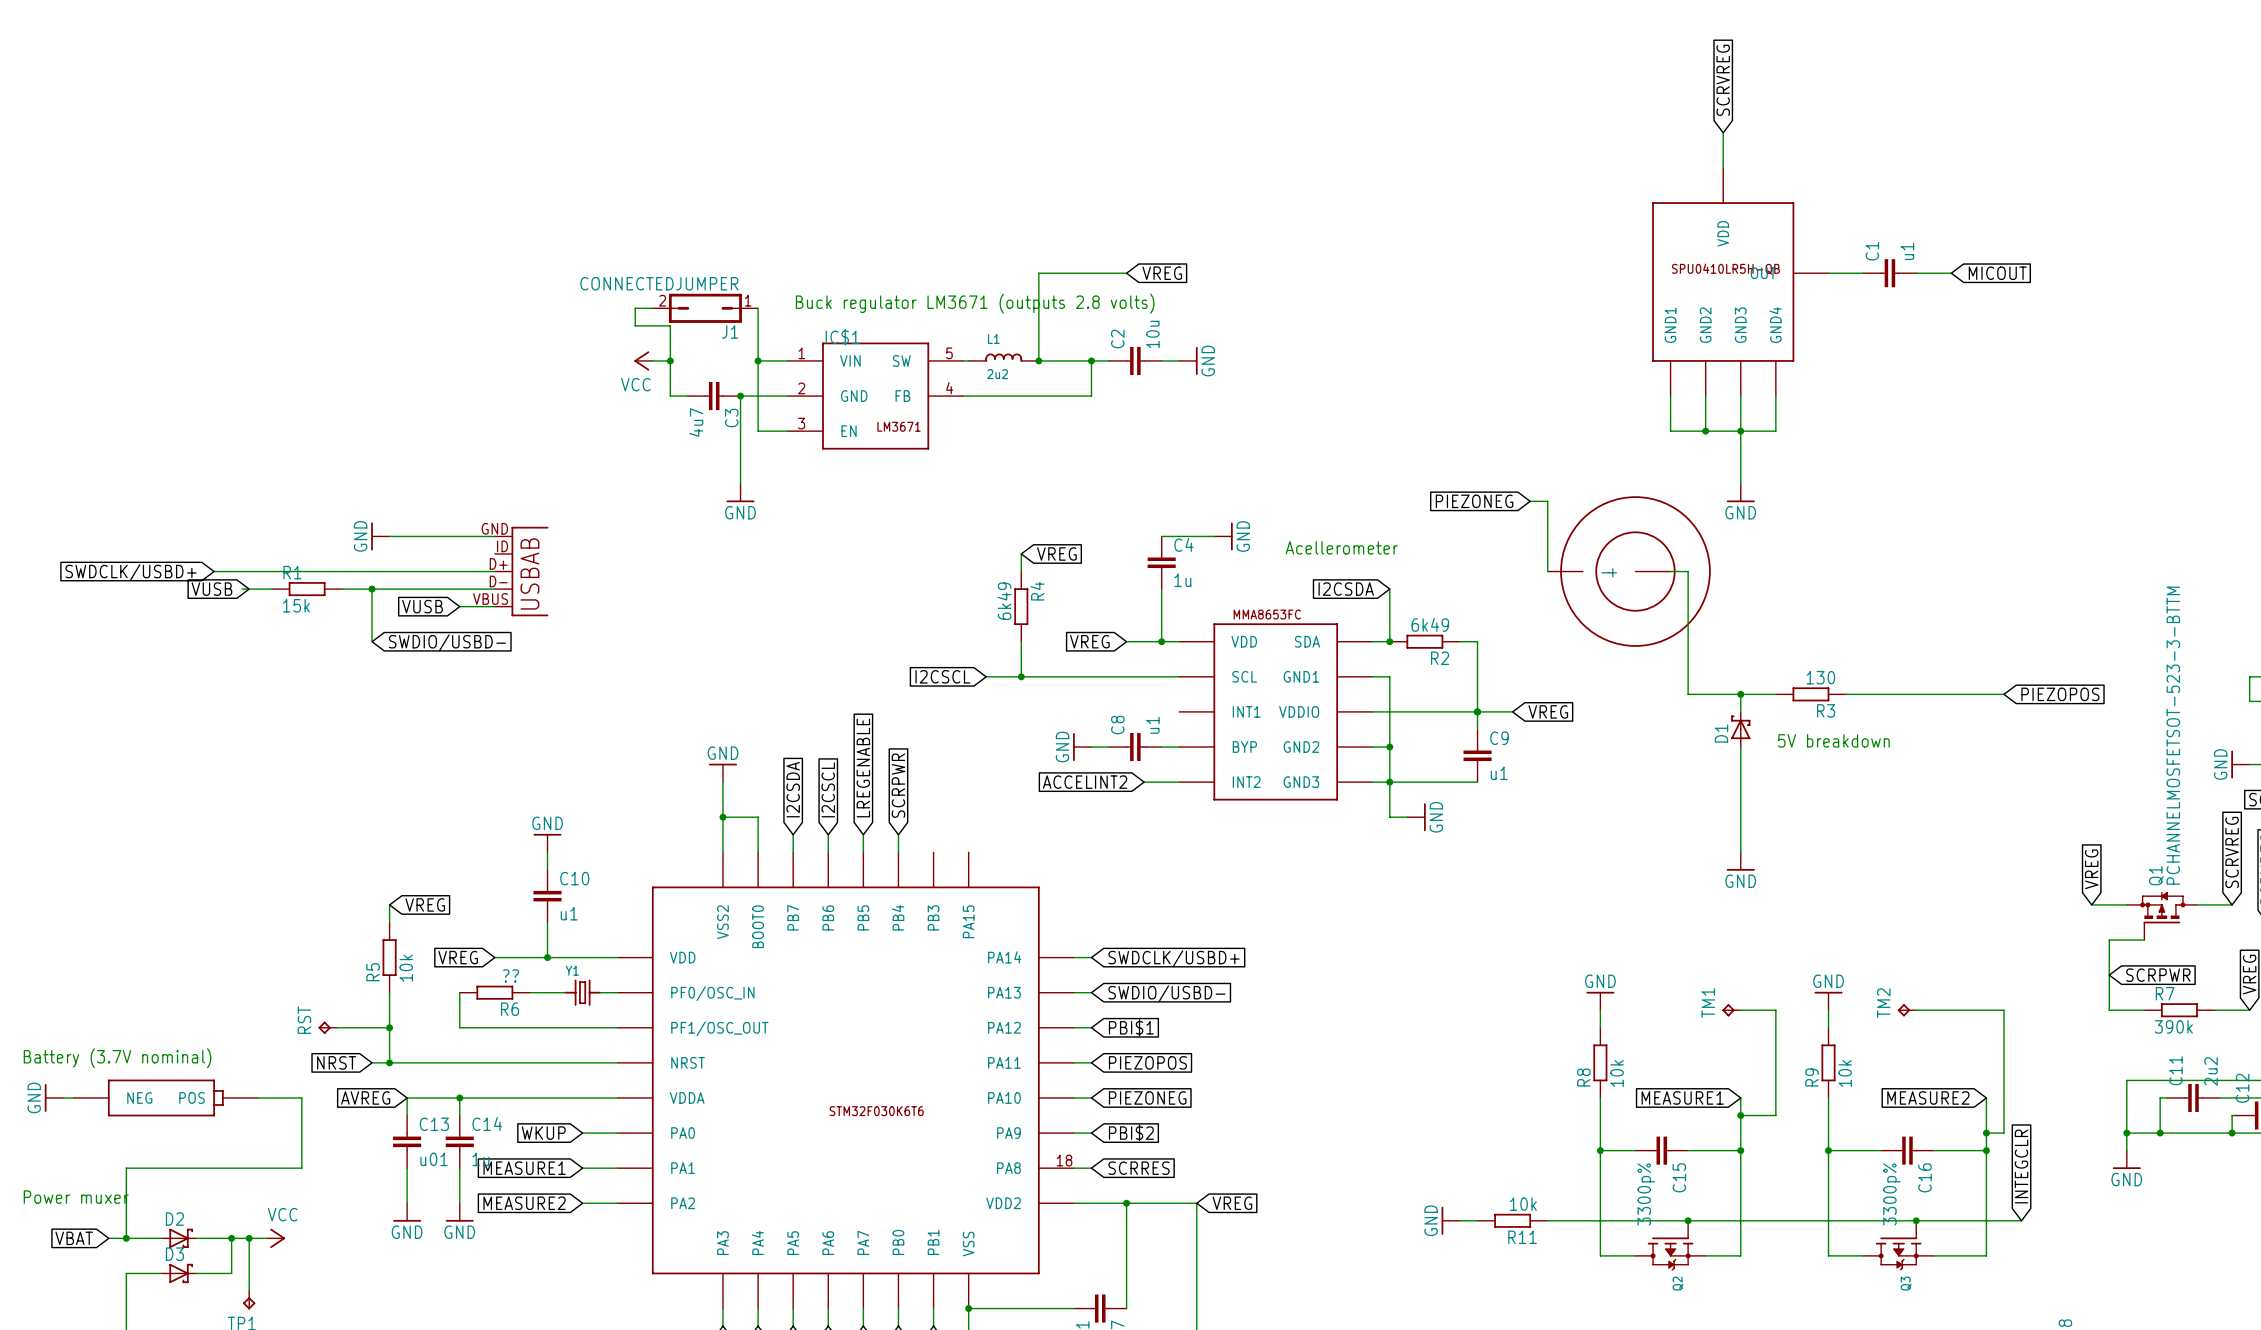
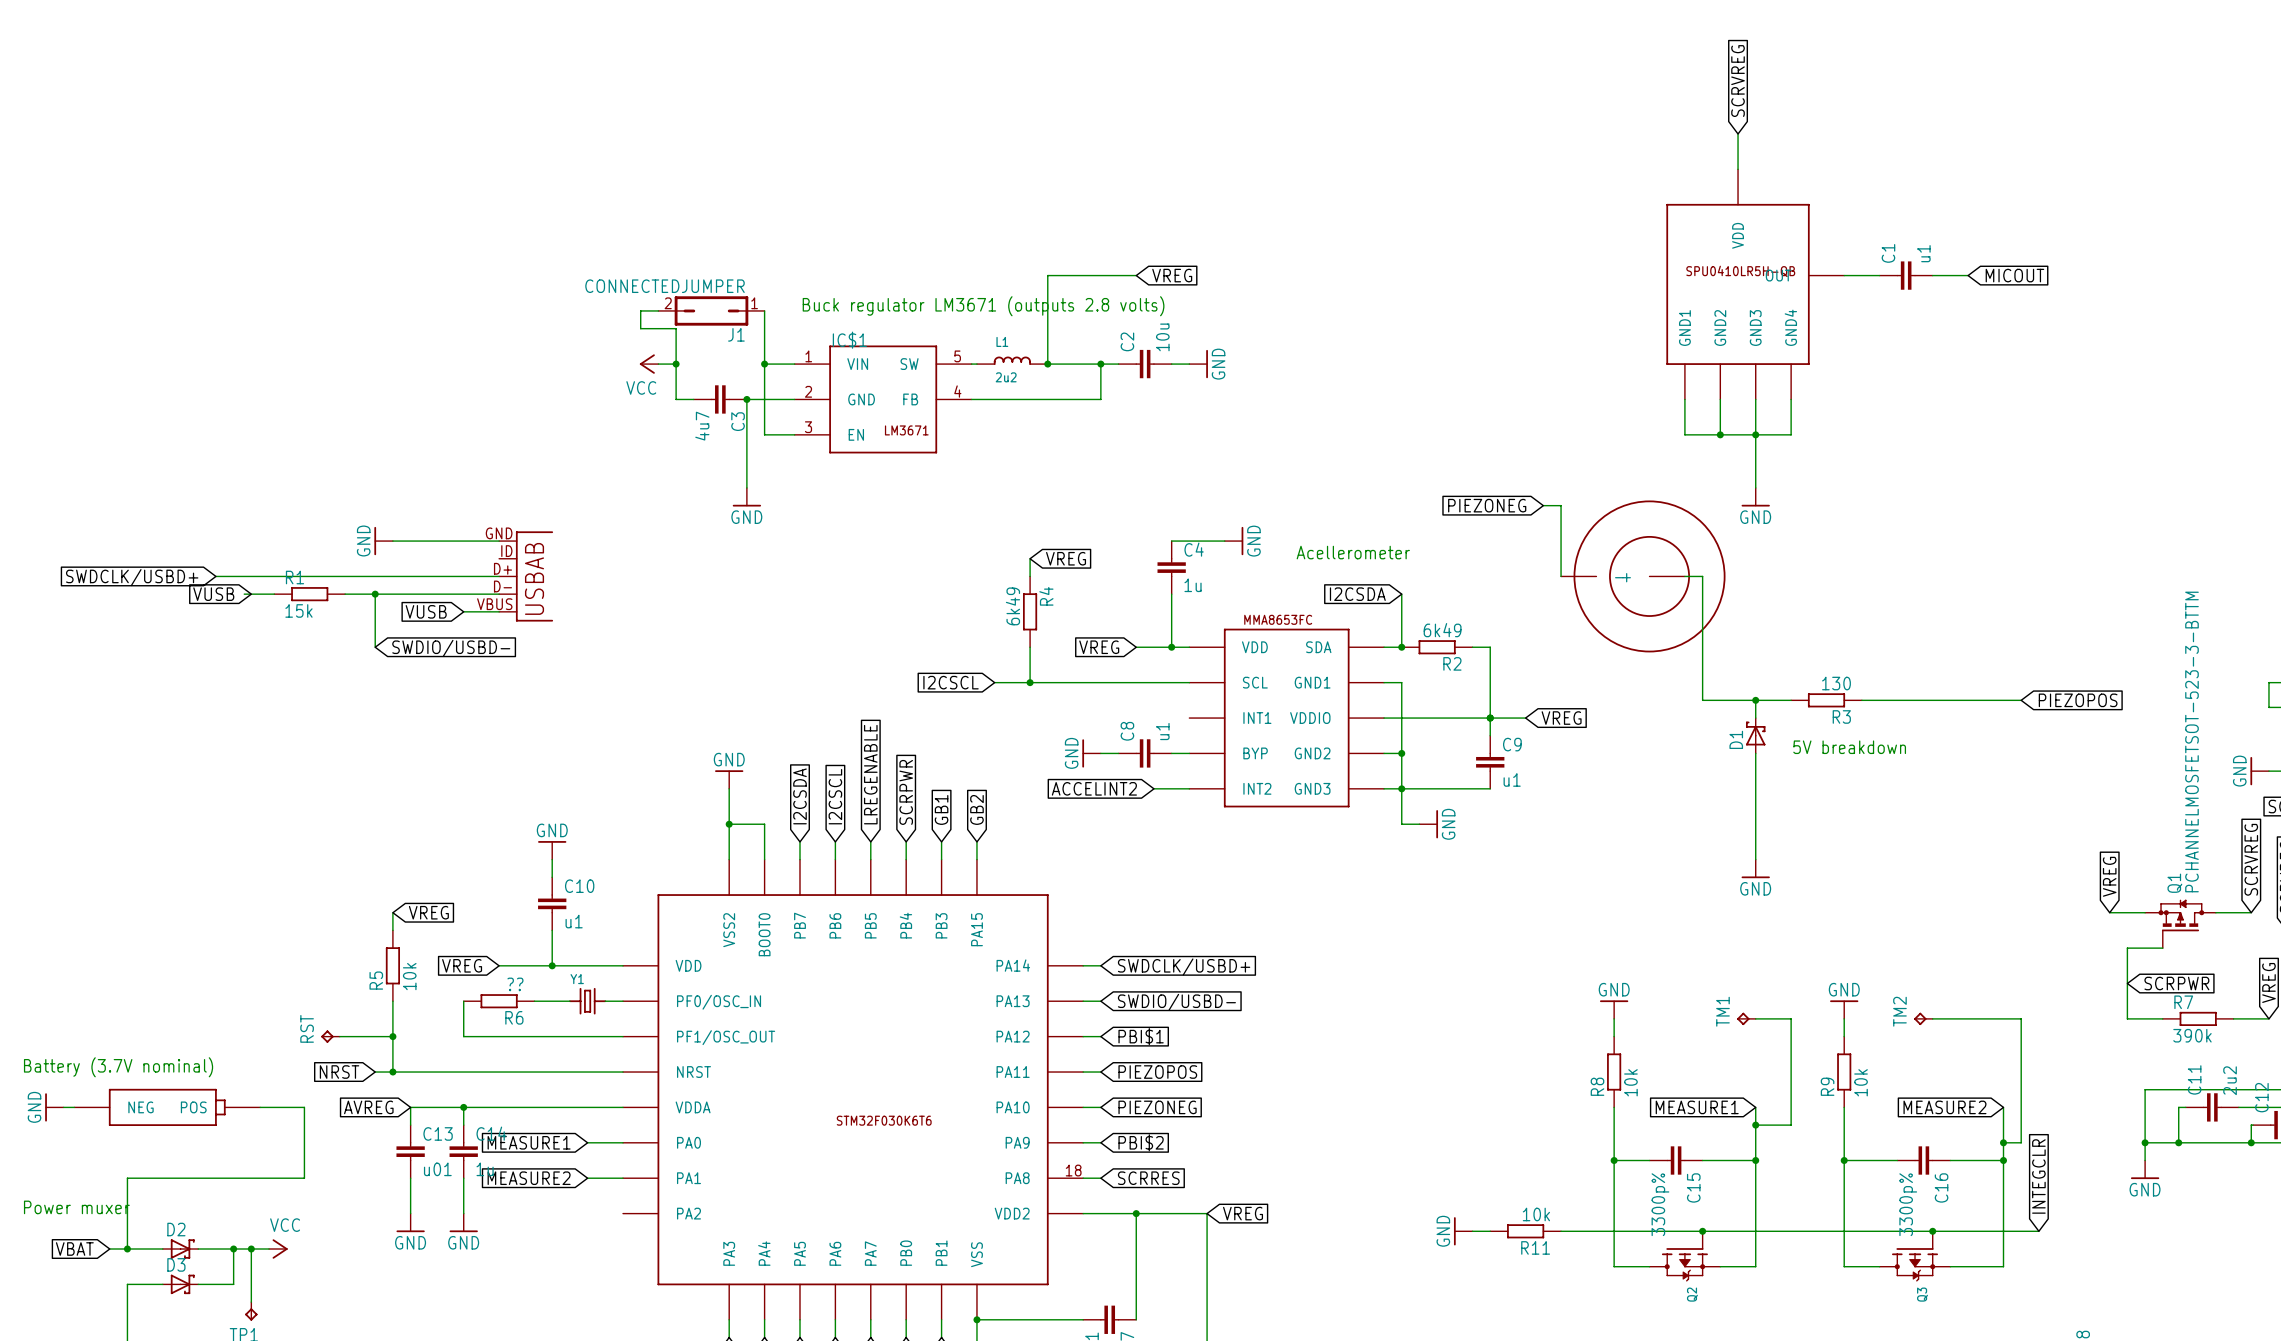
global label: none -> GB1 (941, 809)
global label: none -> GB2 (976, 809)
wire: none -> (941, 841) (941, 859)
wire: none -> (976, 841) (976, 859)
global label: WKUP (543, 1133) -> MEASURE1 (529, 1142)
global label: MEASURE1 (524, 1168) -> MEASURE2 (529, 1178)
global label: MEASURE2 (524, 1203) -> none
wire: (582, 1203) (617, 1203) -> none

